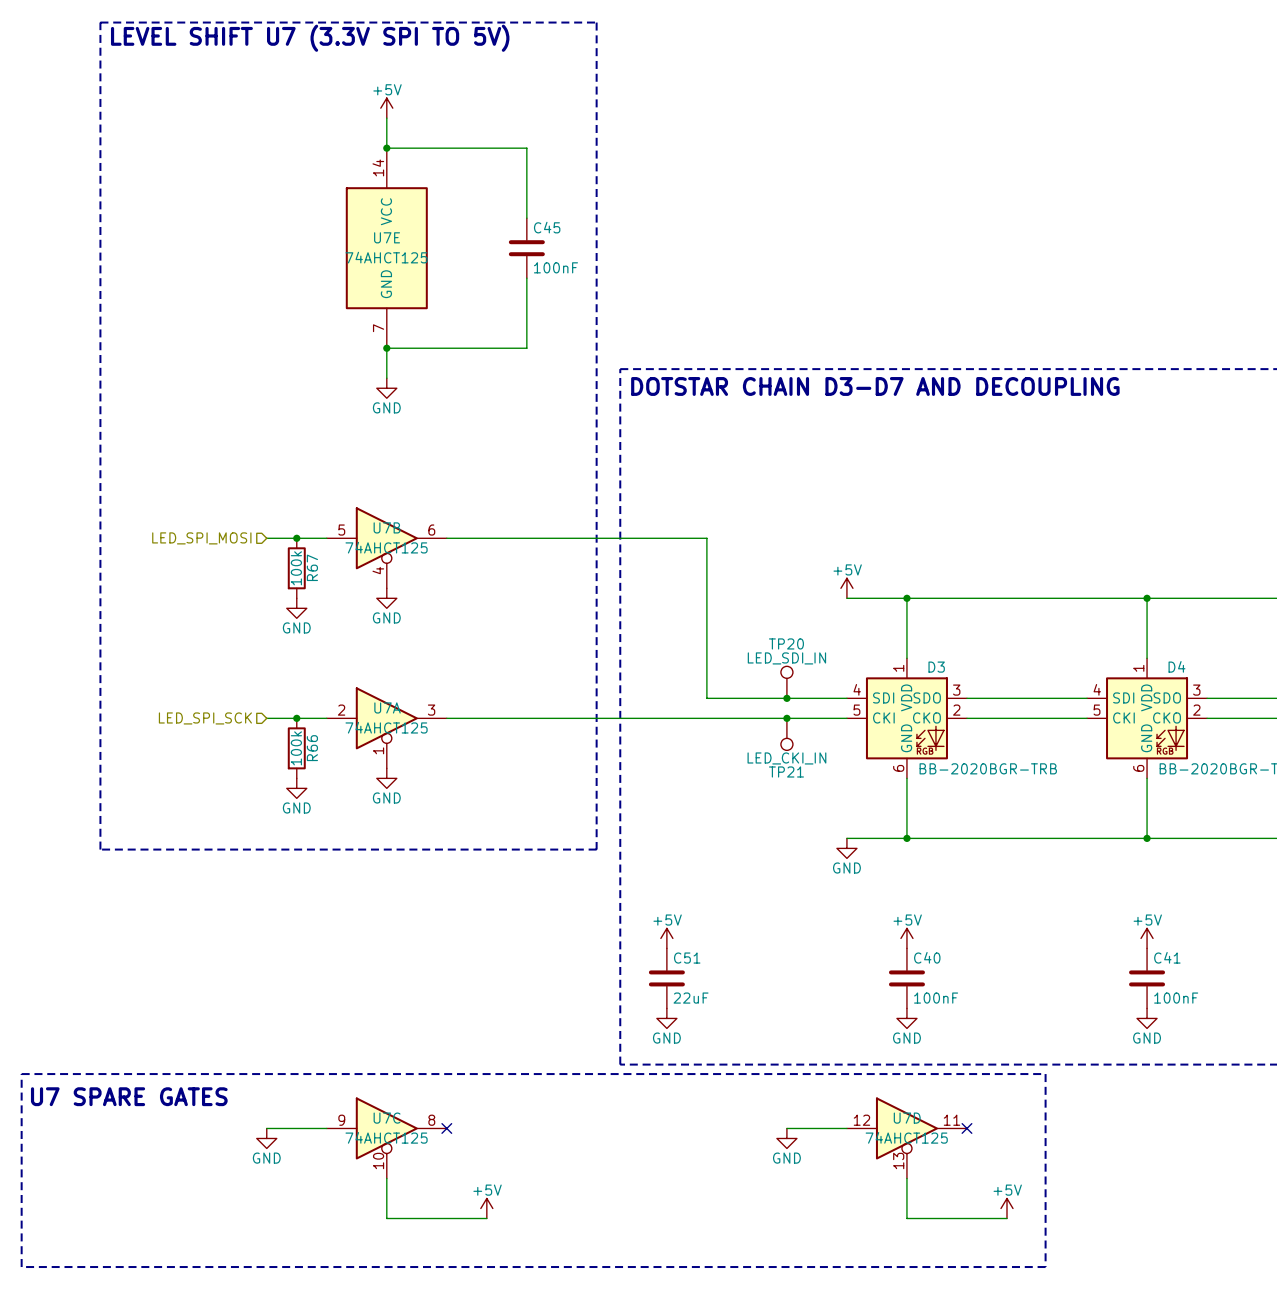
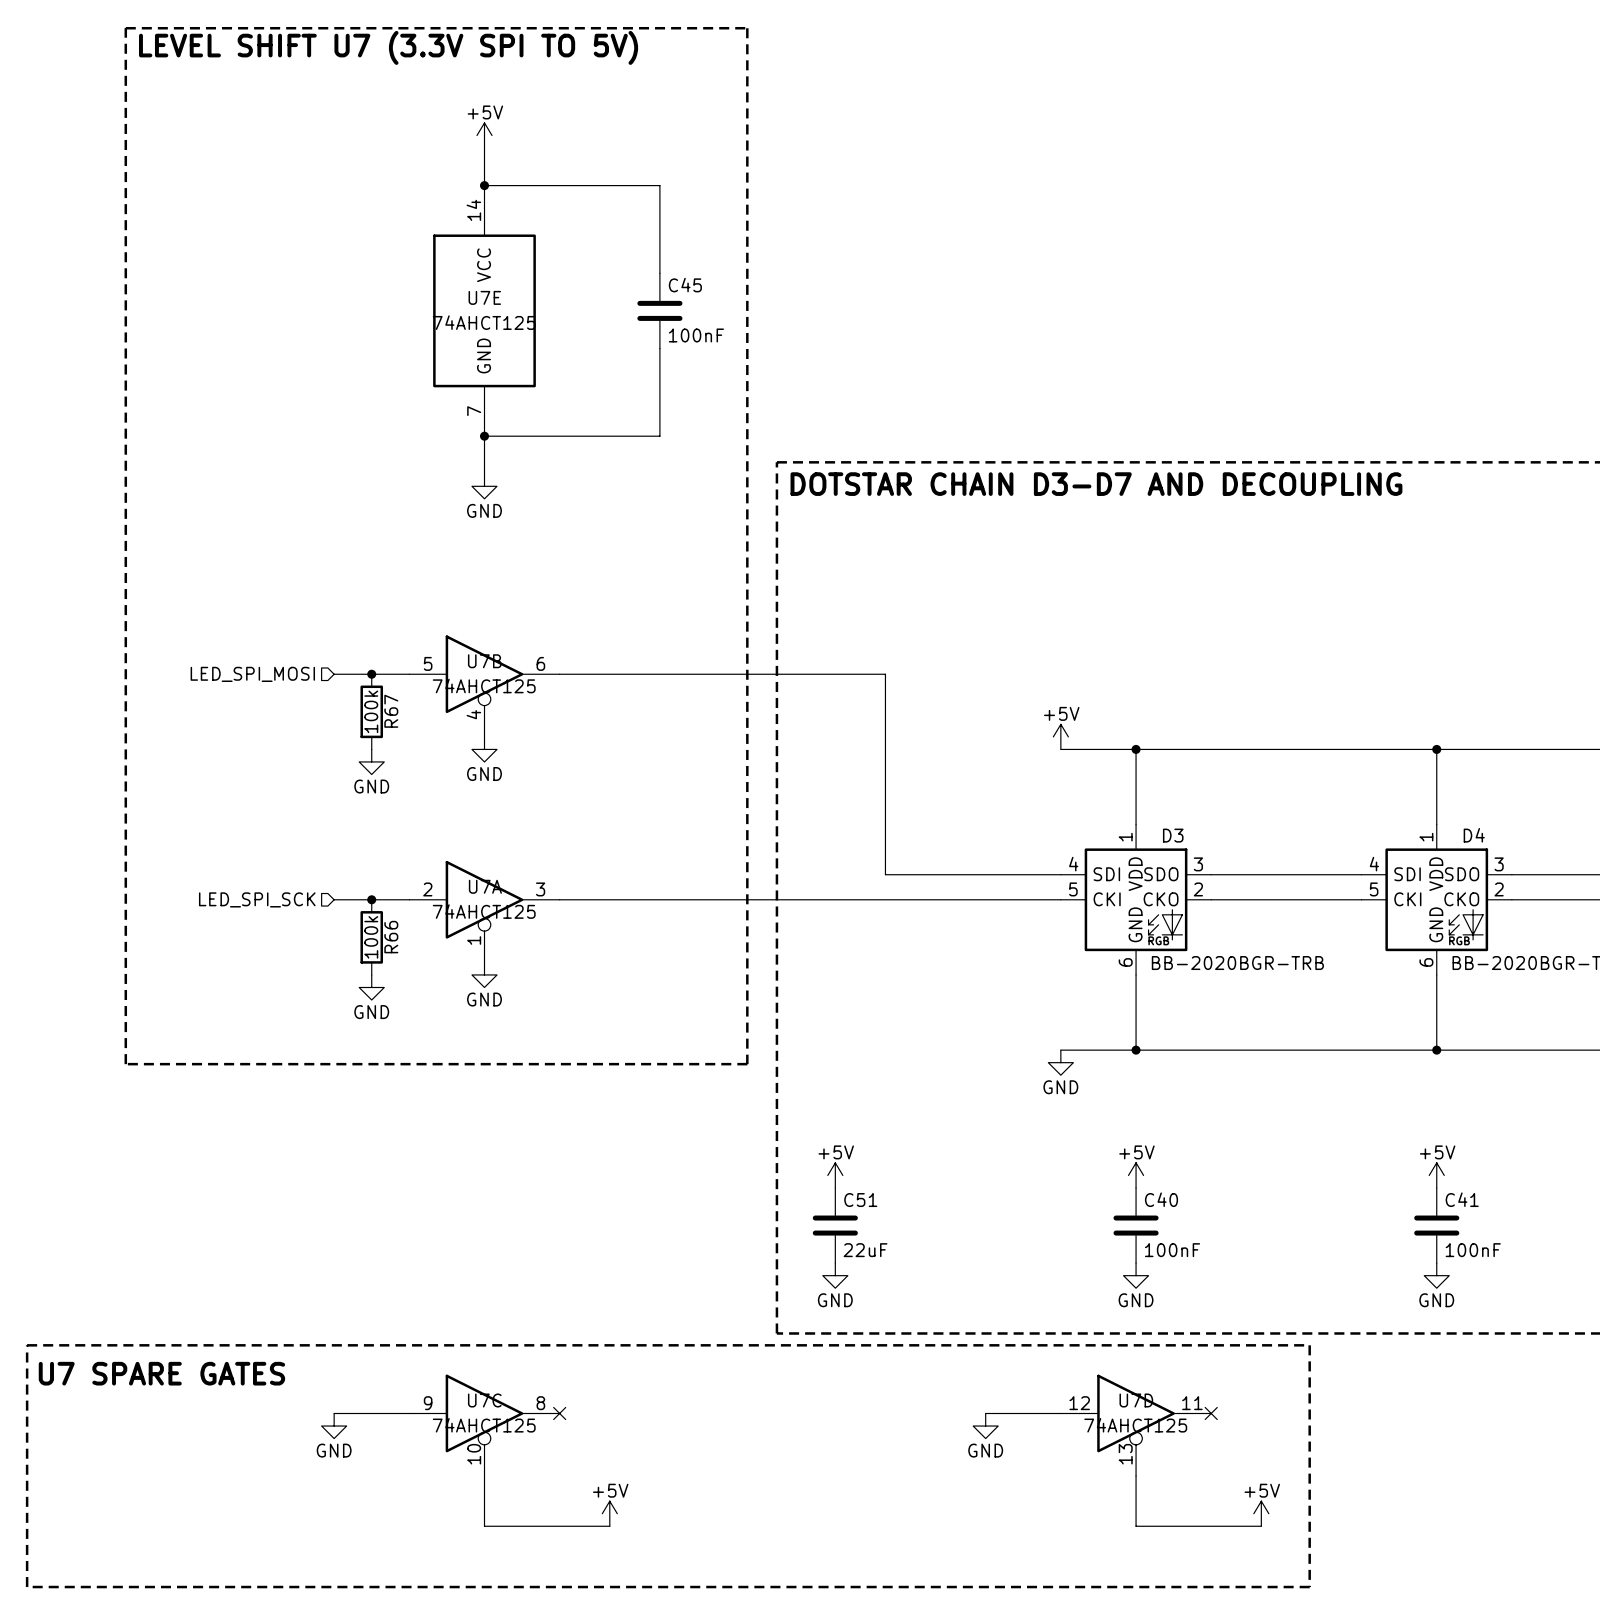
TP20: LED_SDI_IN (786, 682) -> none
junction: (786, 698) -> none
junction: (786, 718) -> none
TP21: LED_CKI_IN (786, 734) -> none

